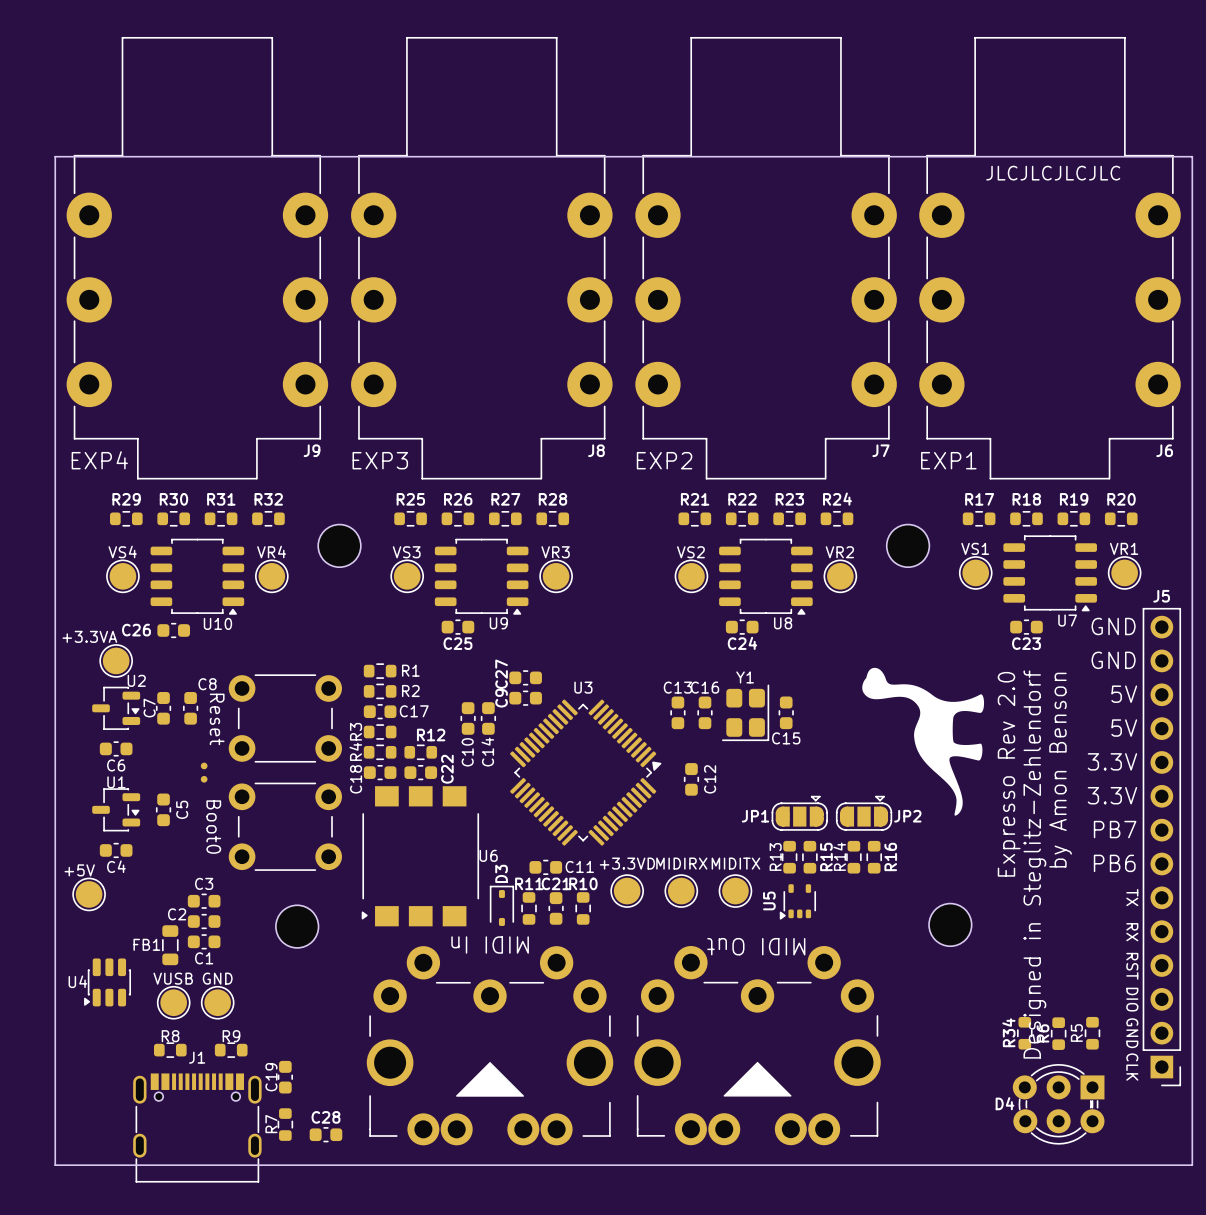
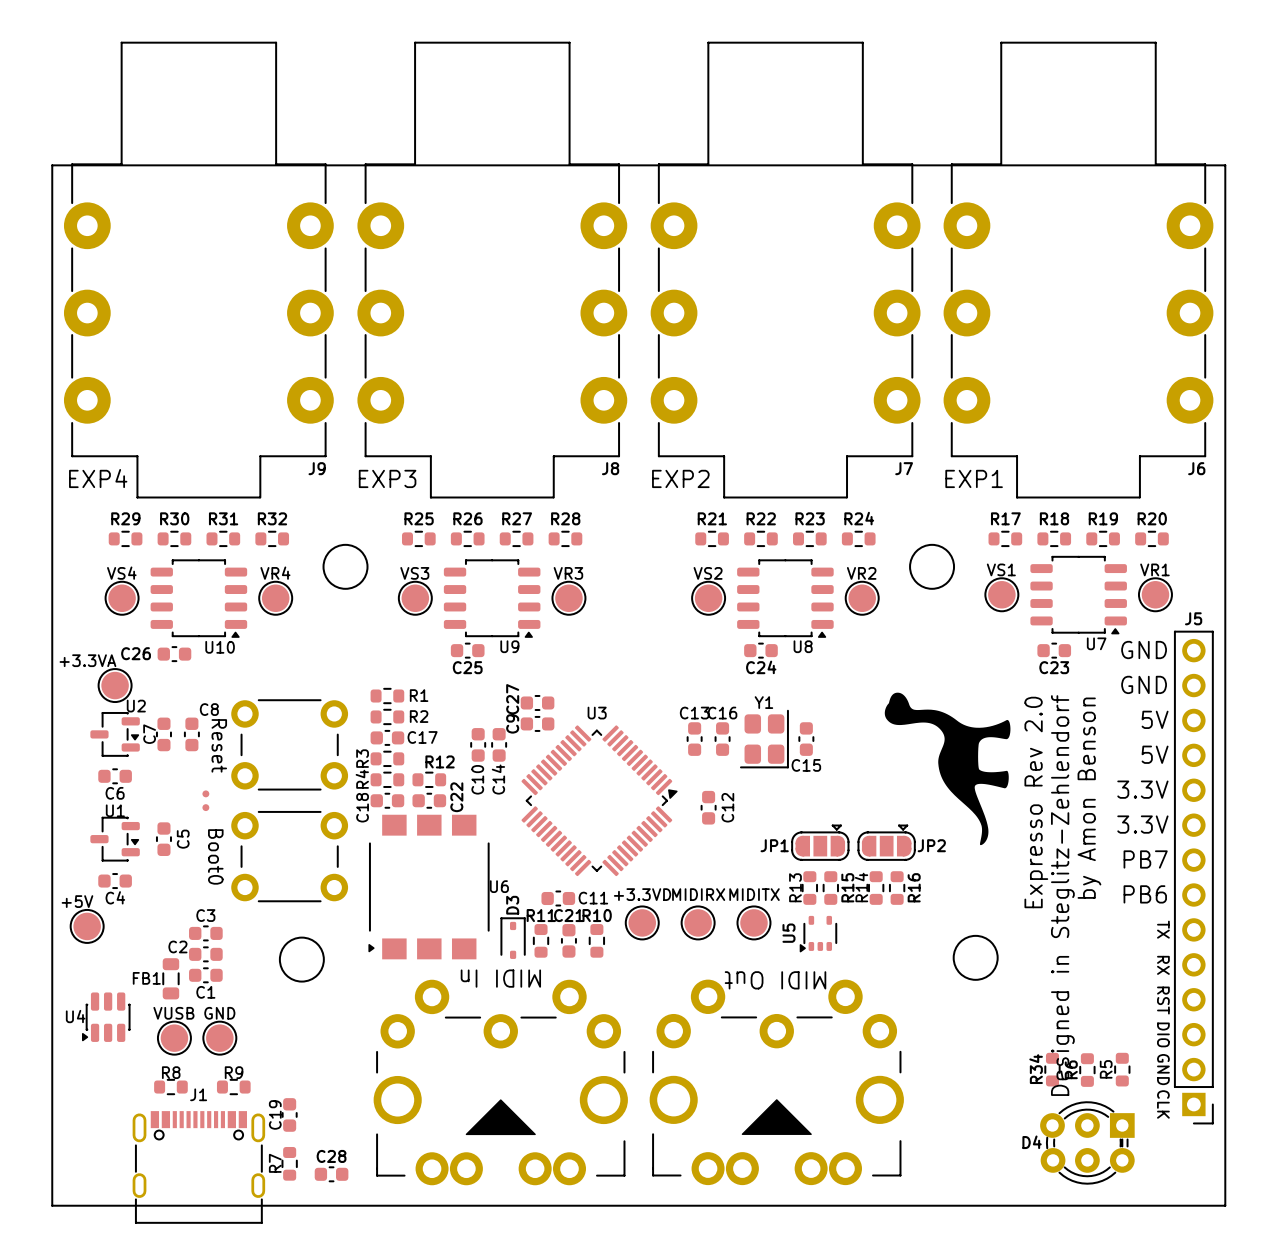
text: JLCJLCJLCJLC (1053, 173) -> none

